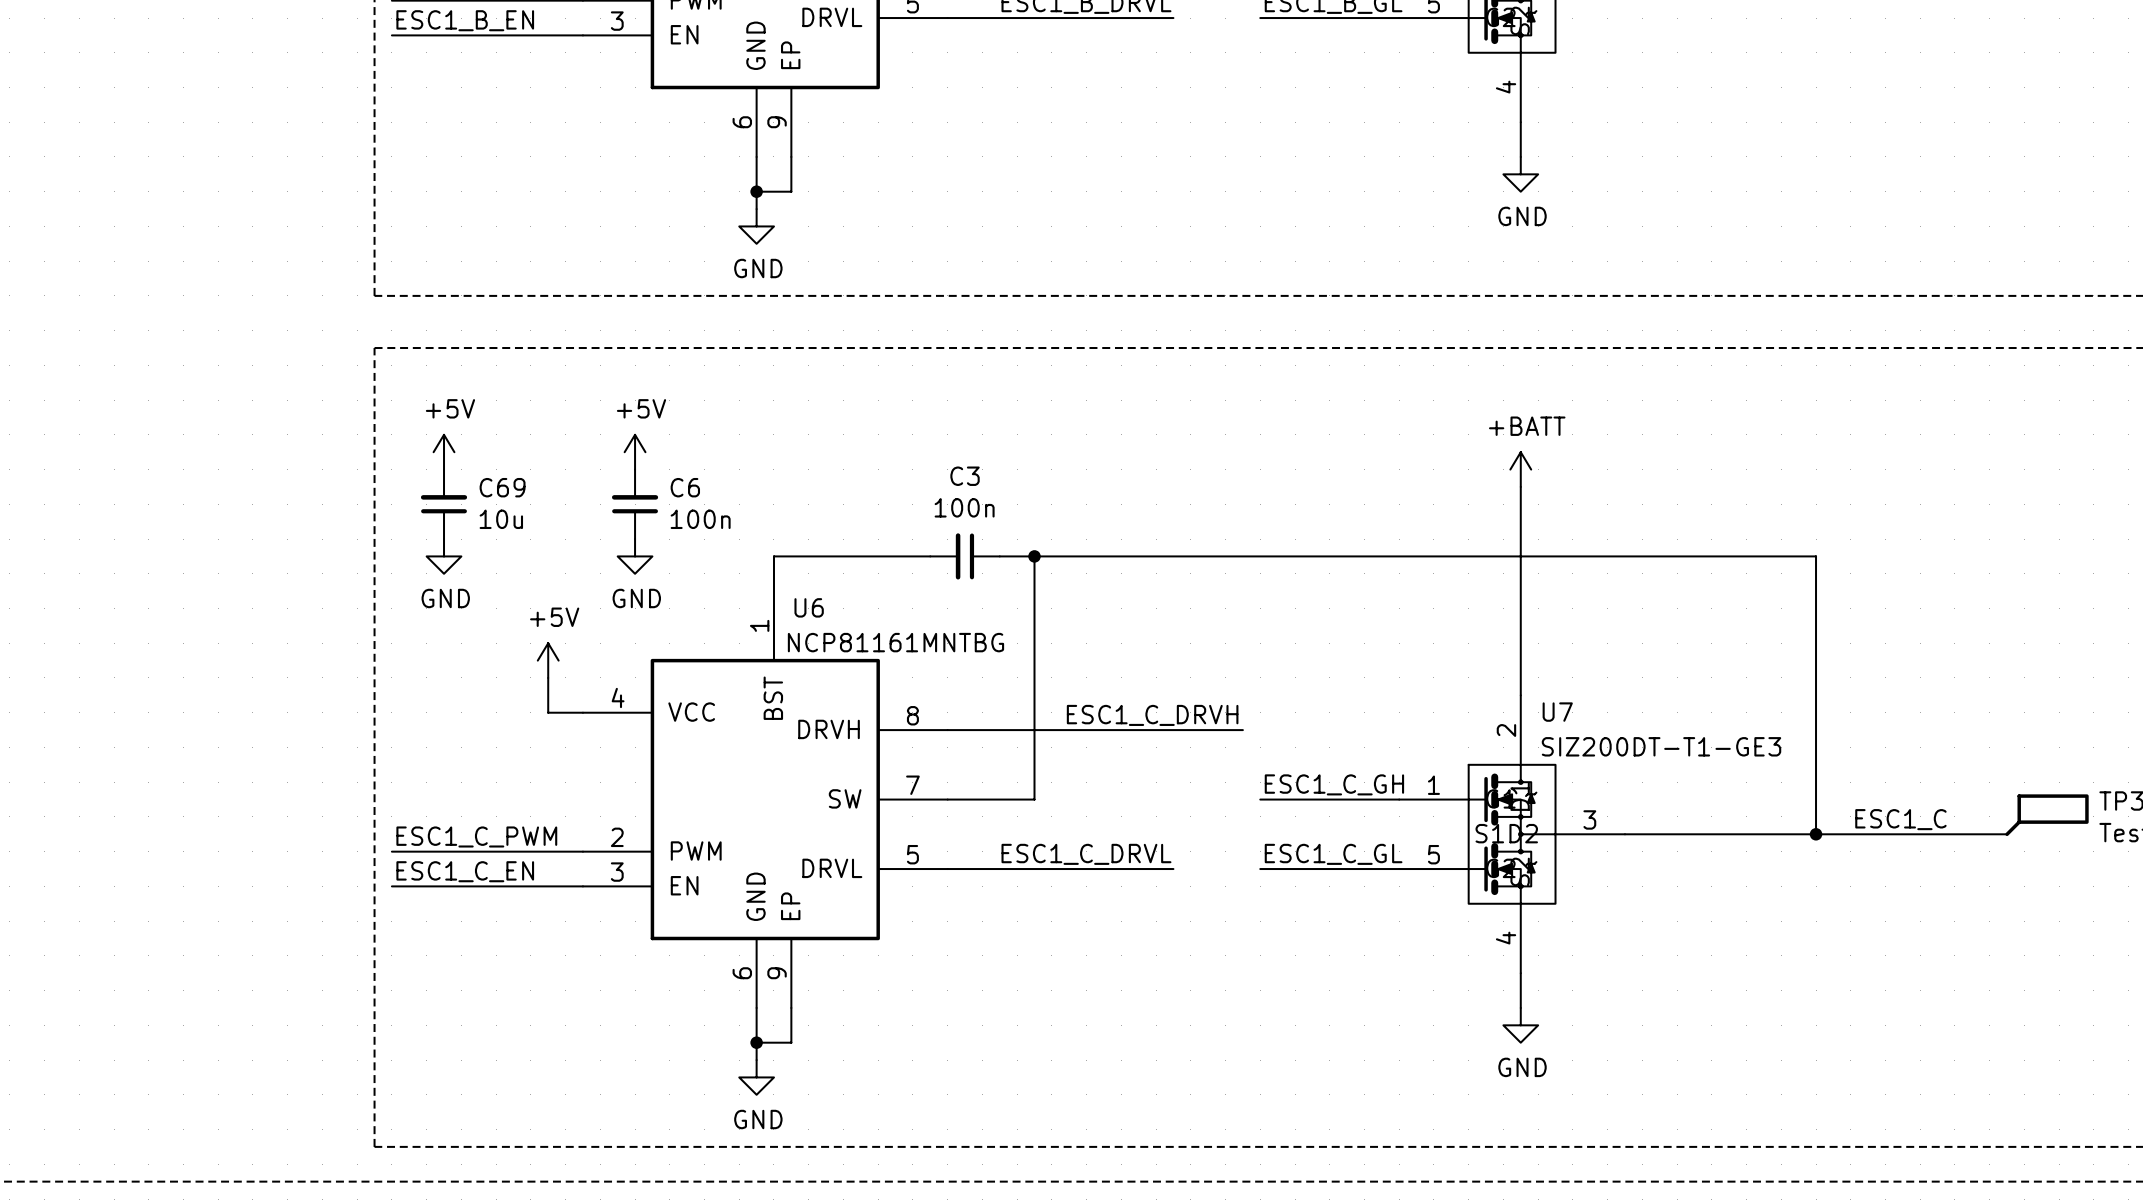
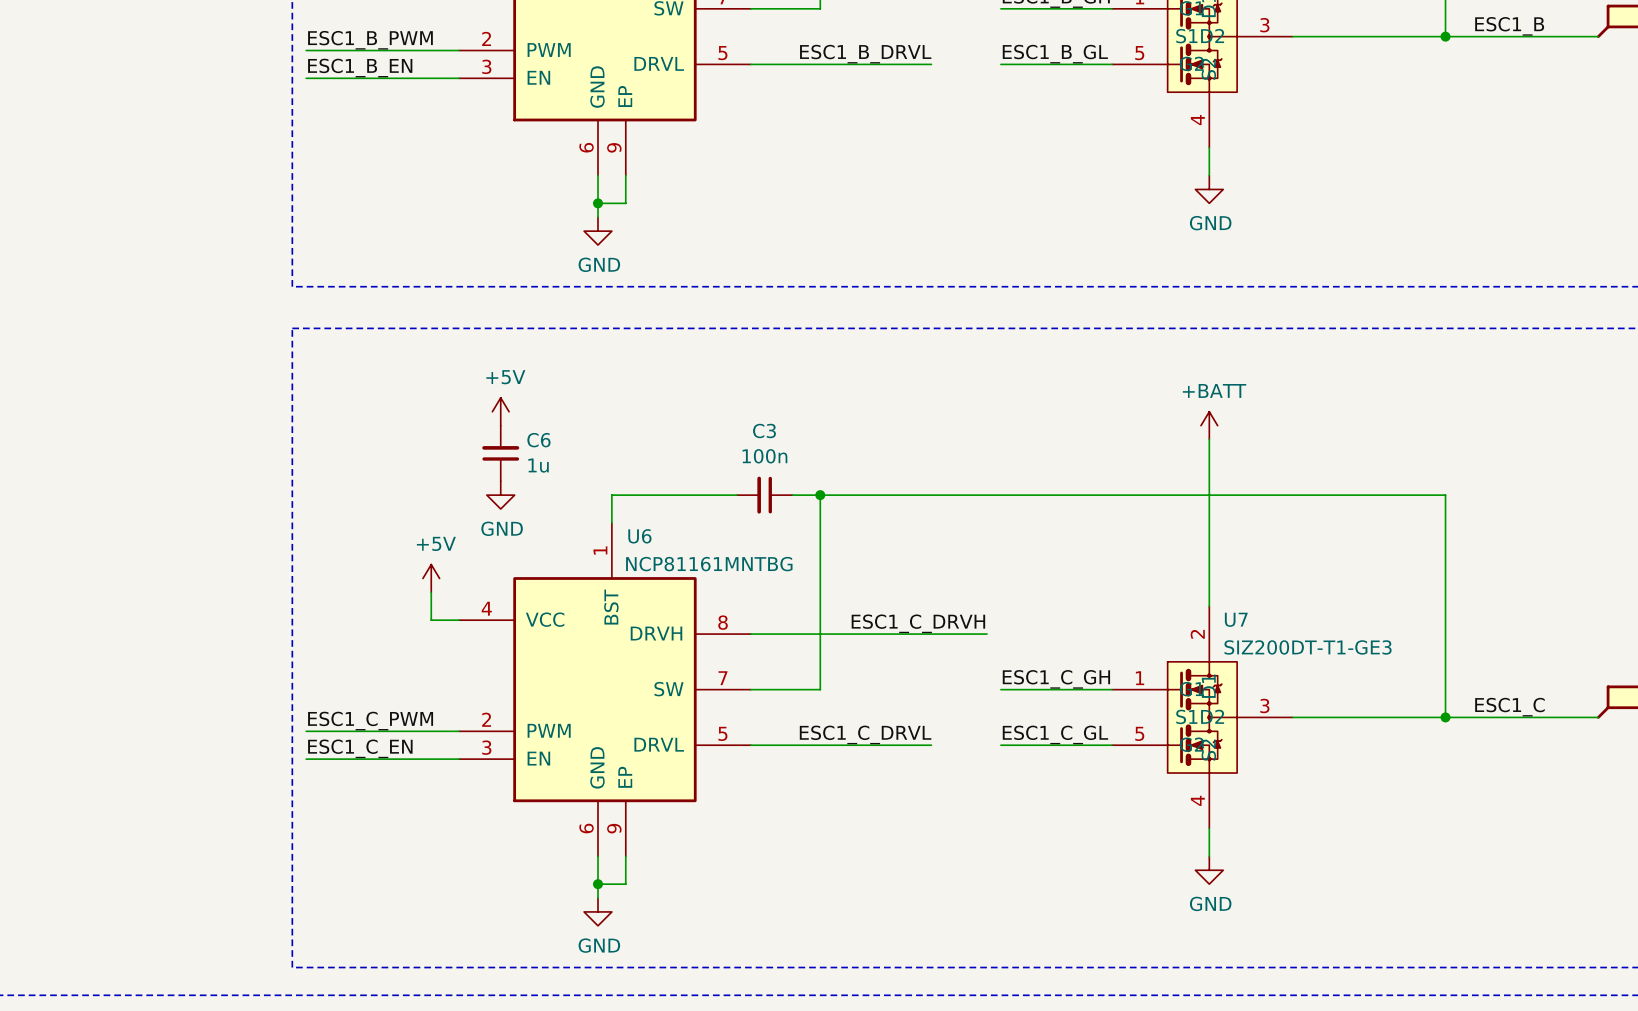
power symbol: +5V (444, 452) -> none
C69: 10u (444, 504) -> none
C6 value: 100n (700, 519) -> 1u (538, 465)
power symbol: GND (444, 556) -> none

